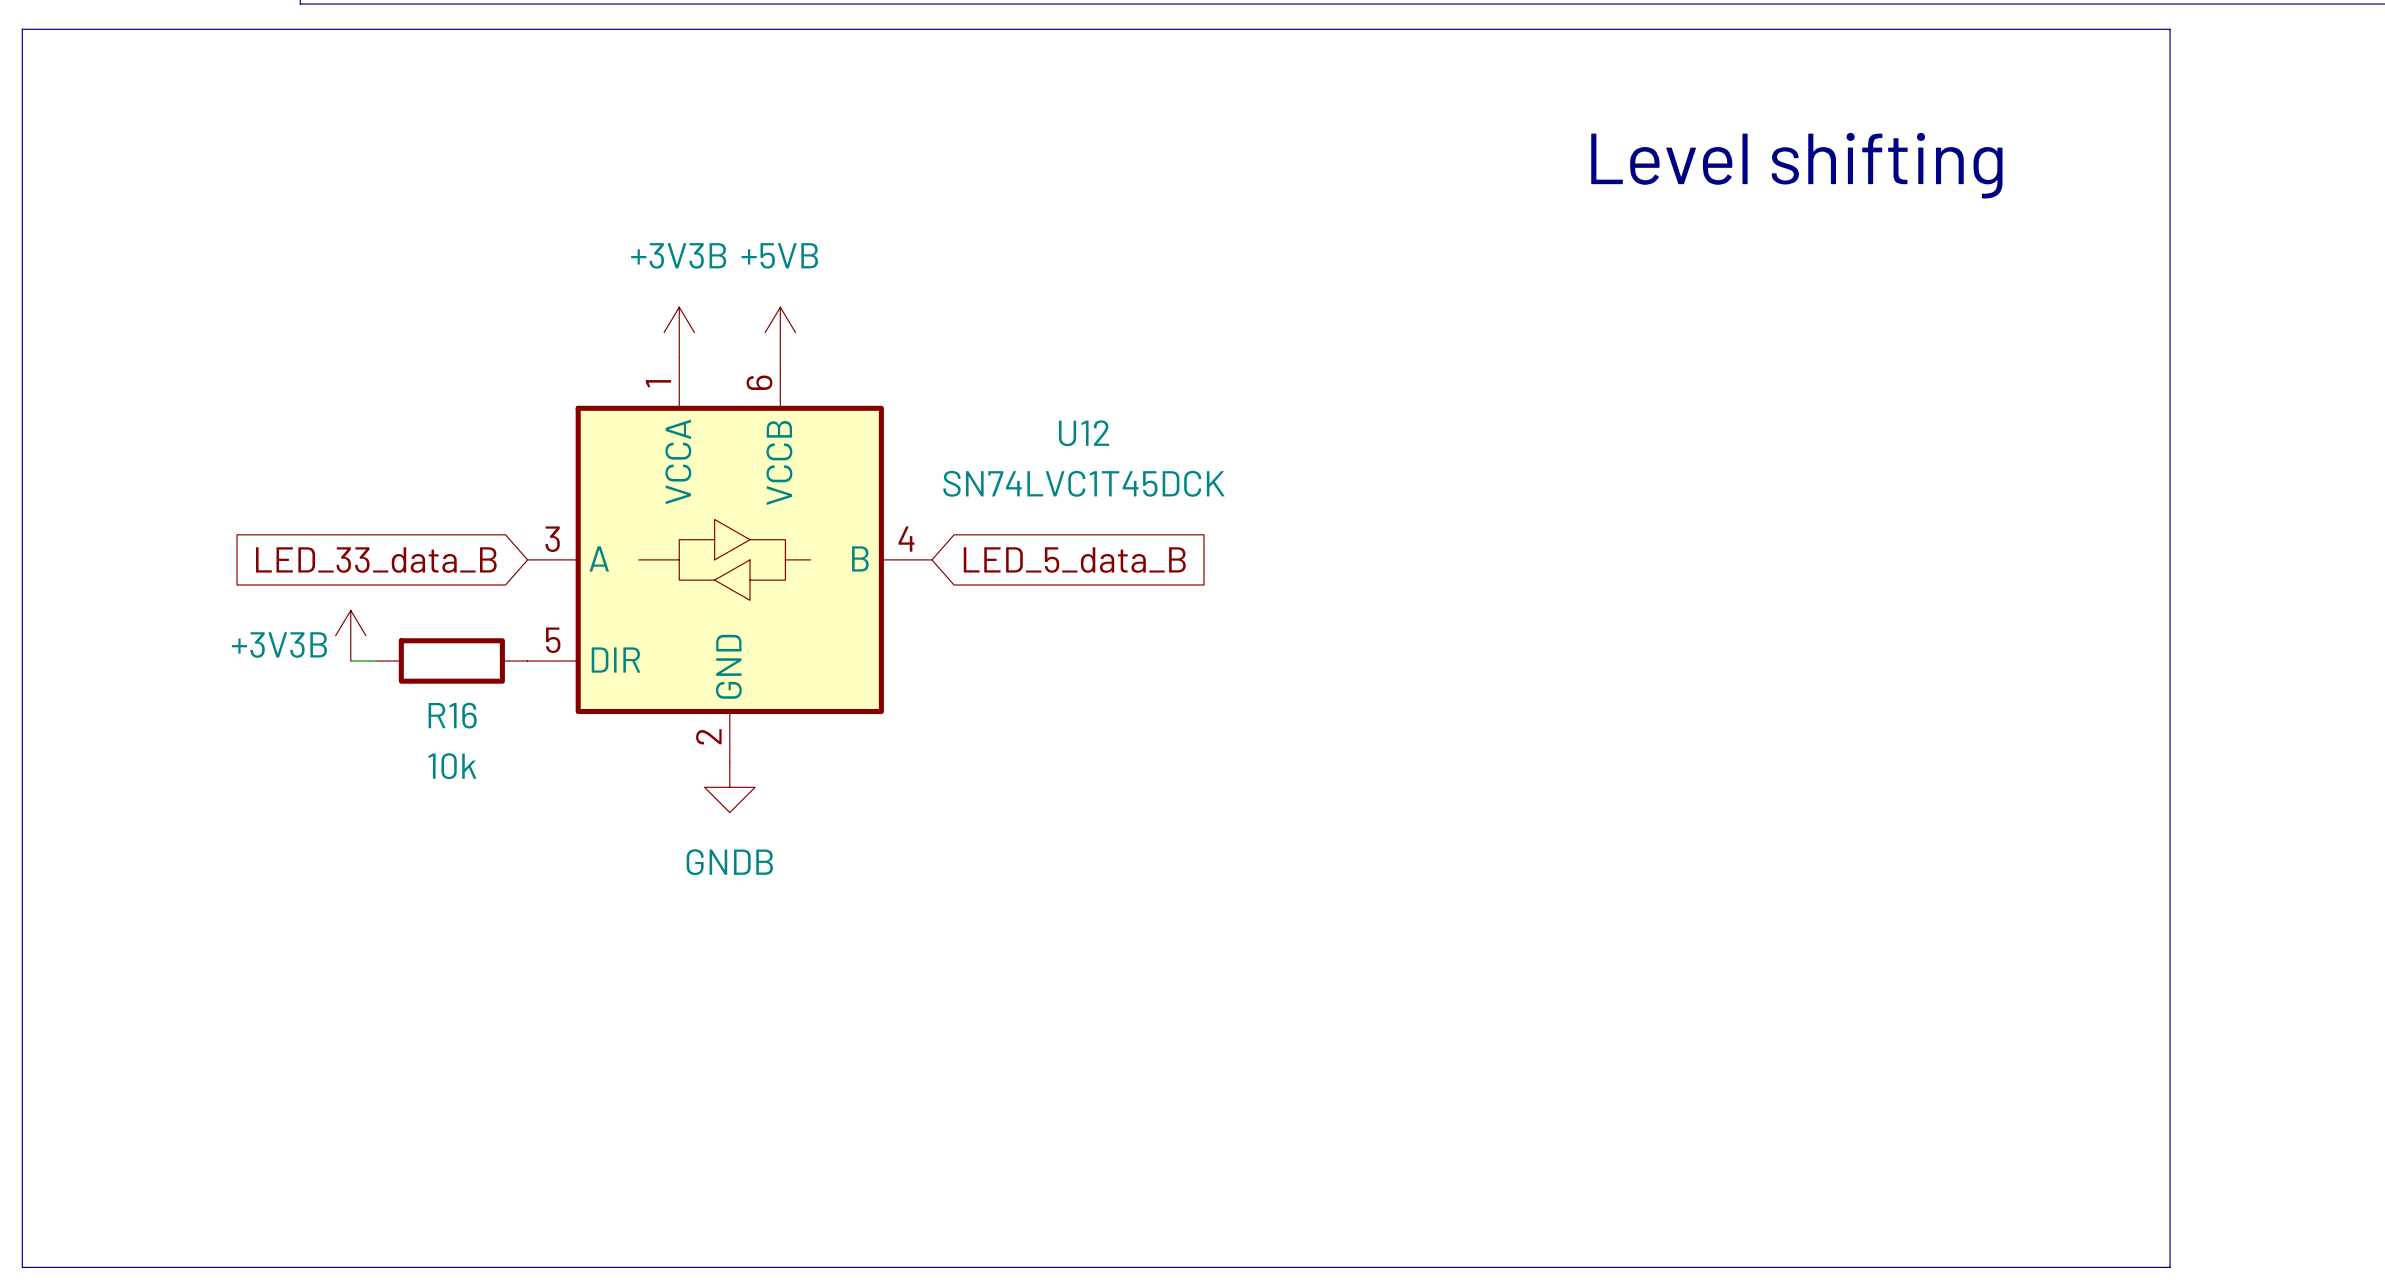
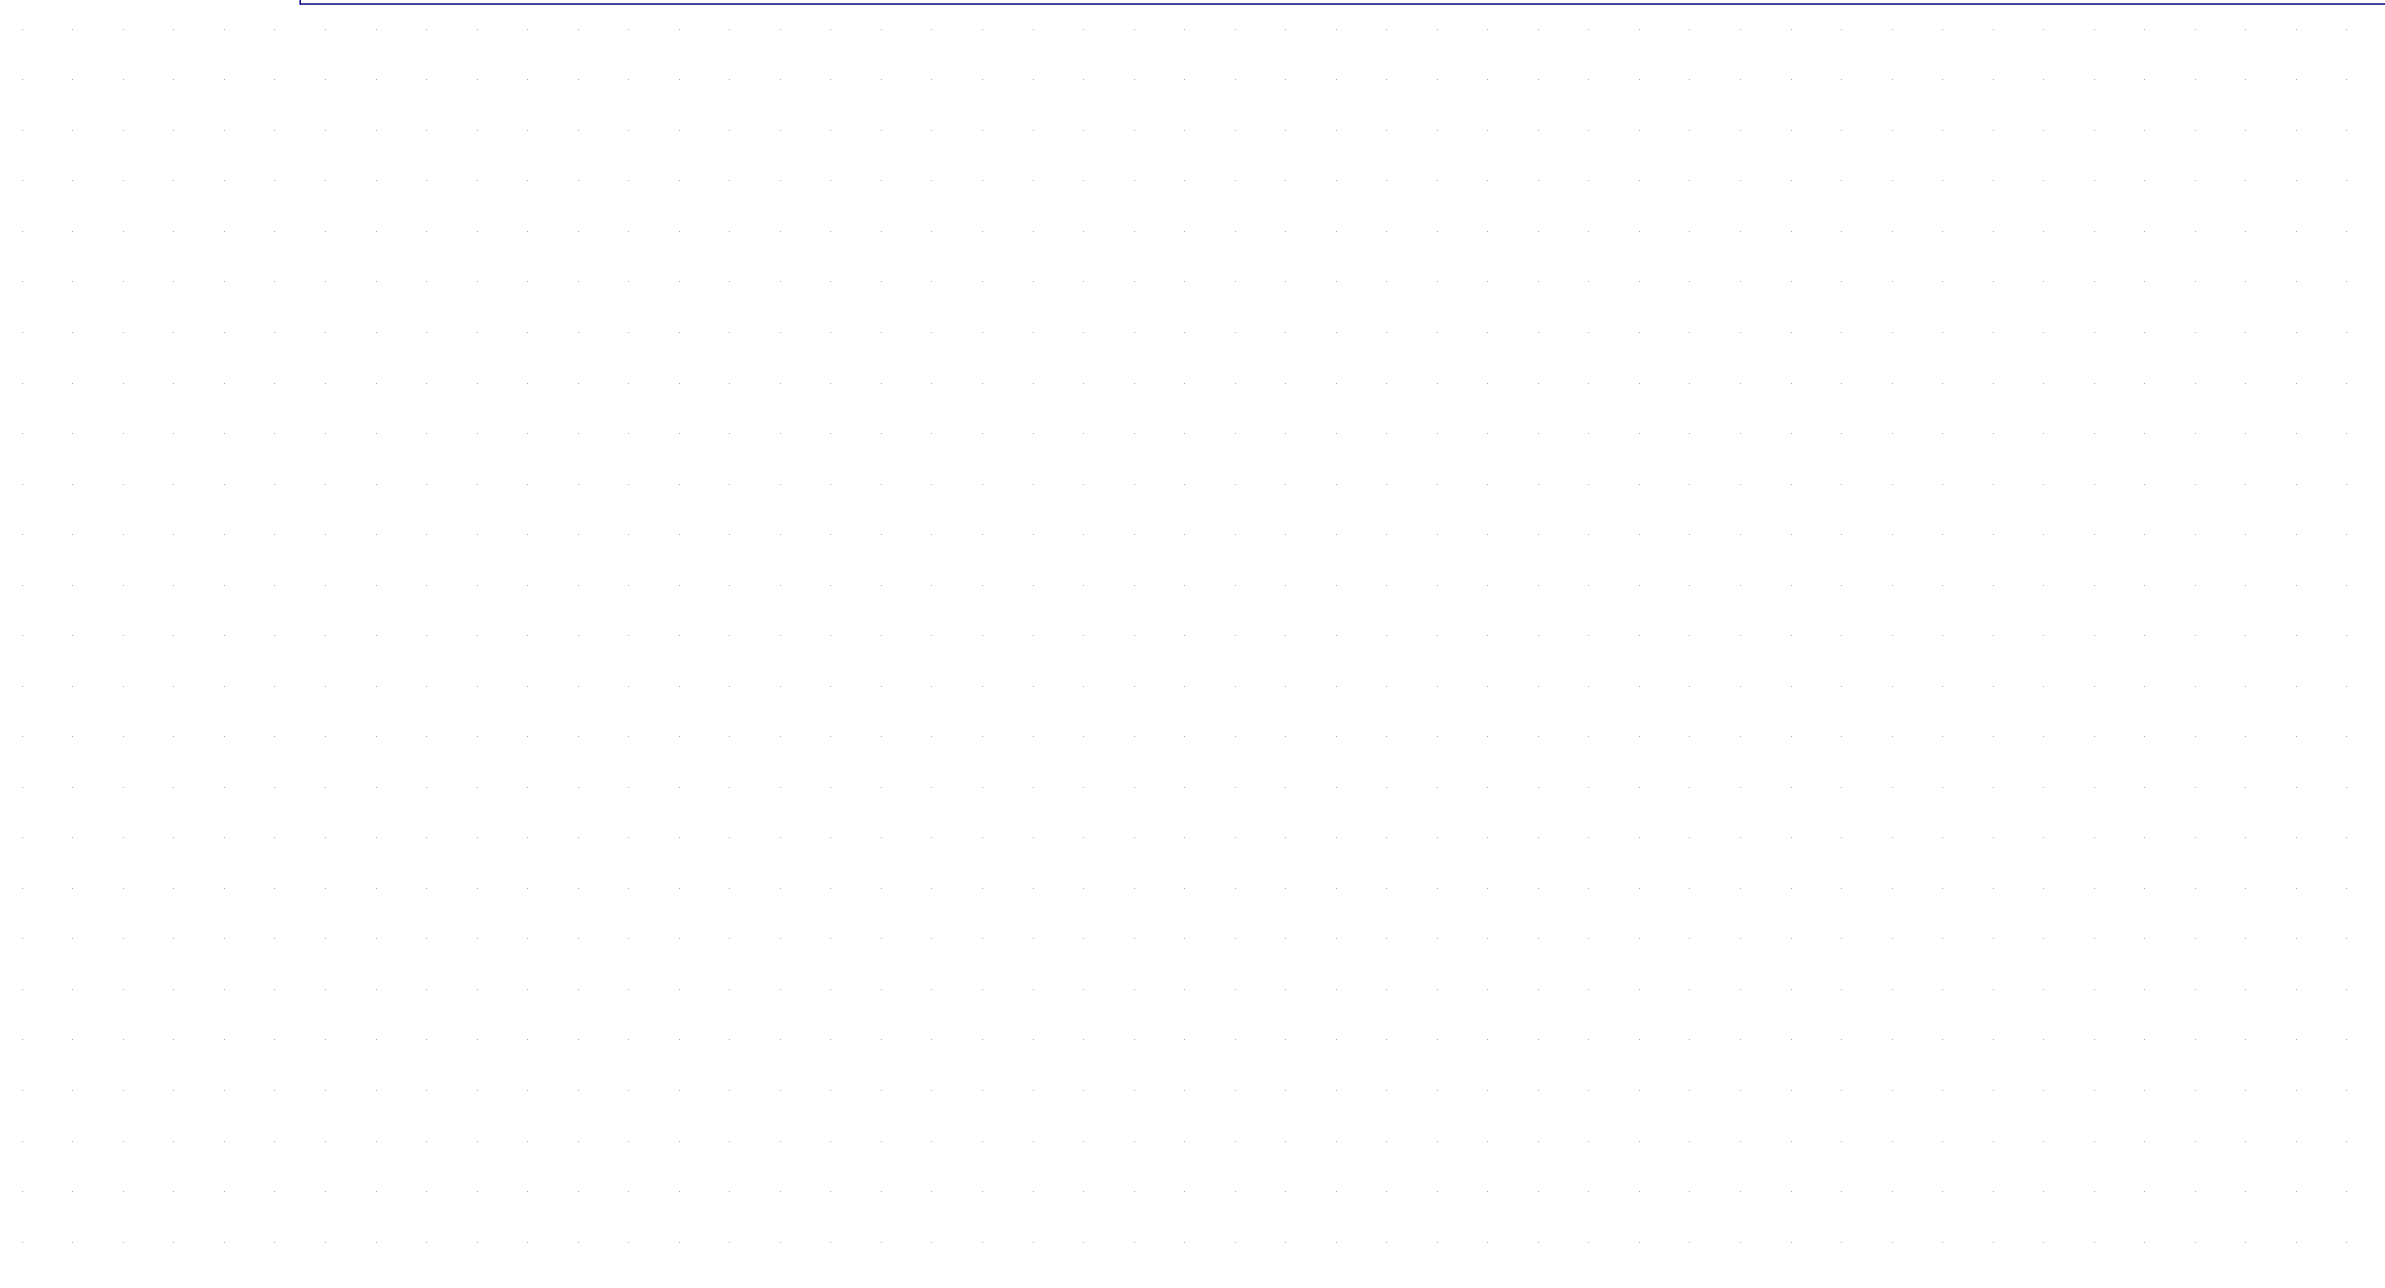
line: (22, 29) (2170, 29) (2170, 1267) (22, 1267) (22, 29) -> none
text: Level shifting (1796, 165) -> none
power symbol: +3V3B (679, 332) -> none
power symbol: +5VB (780, 332) -> none
U12: SN74LVC1T45DCK (729, 559) -> none
global label: LED_33_data_B (376, 560) -> none
global label: LED_5_data_B (1074, 560) -> none
power symbol: +3V3B (350, 635) -> none
wire: (350, 660) (376, 660) -> none
R16: 10k (451, 660) -> none
power symbol: GNDB (729, 787) -> none

